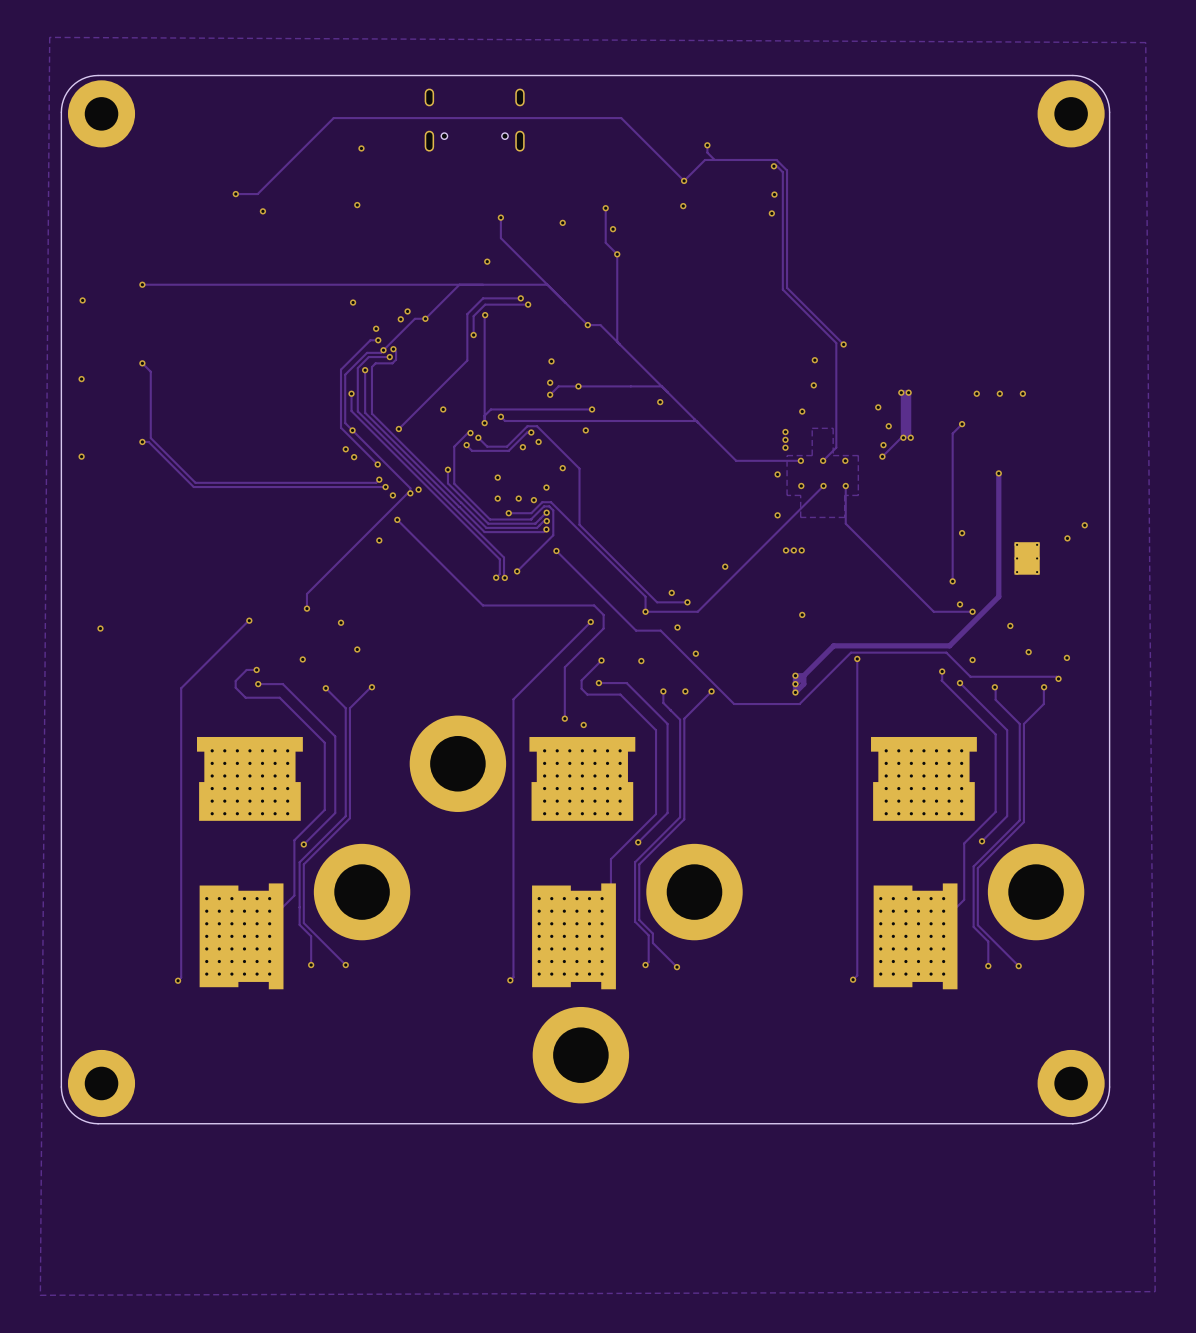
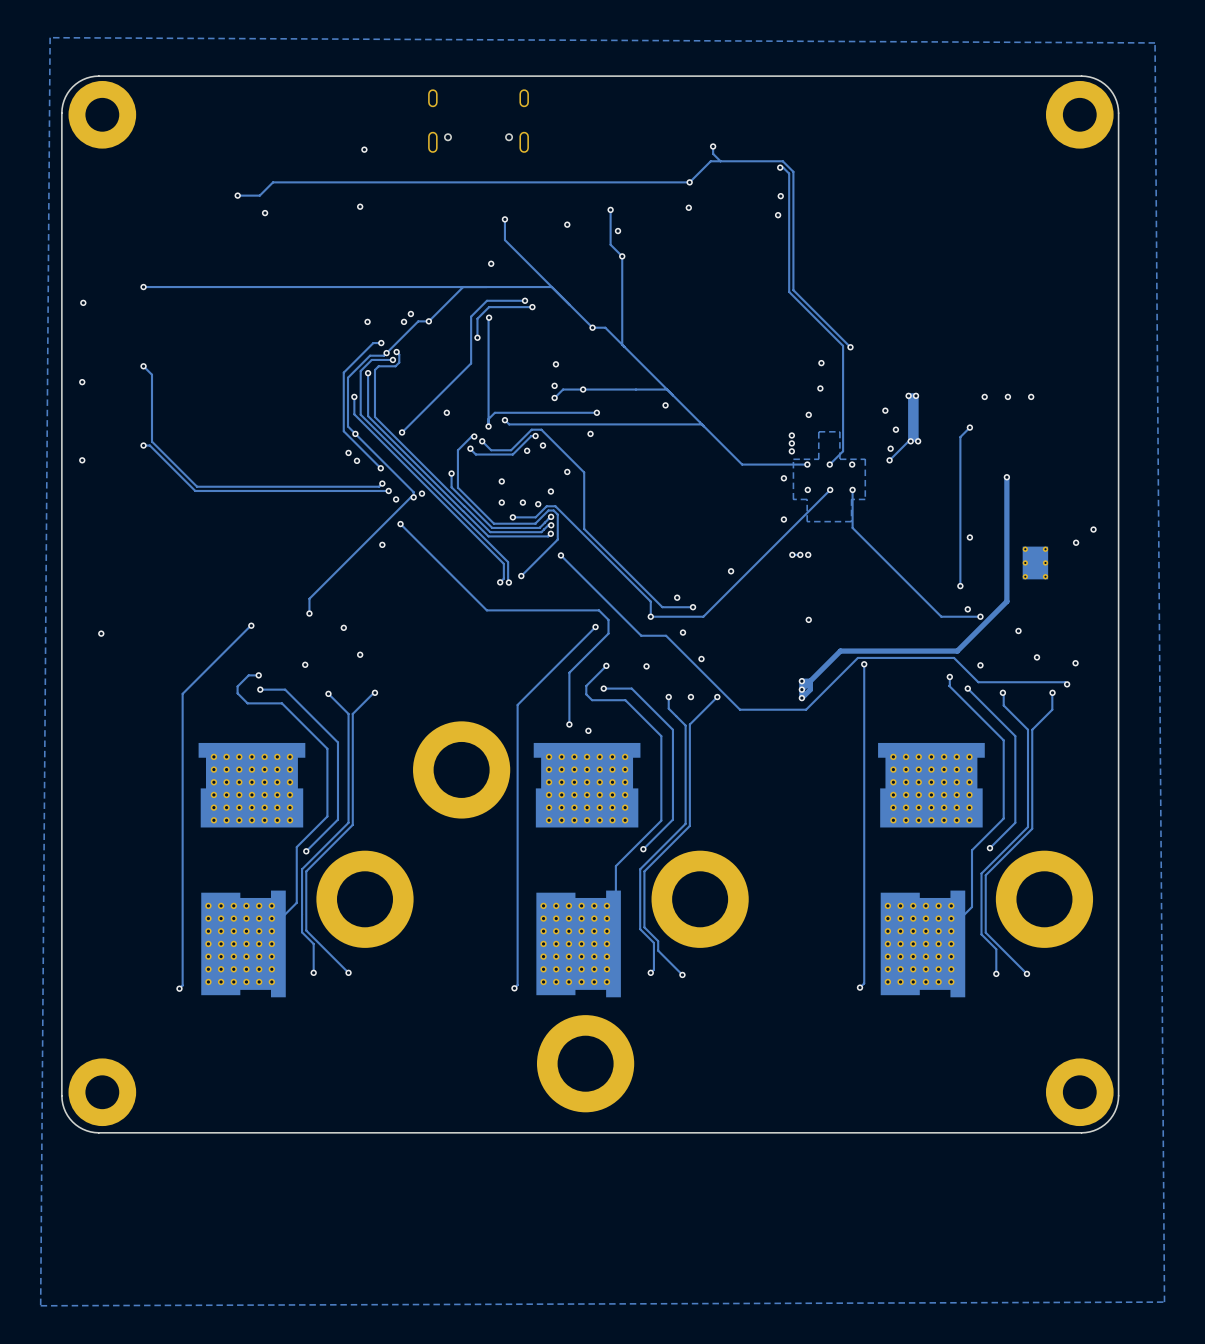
track: (684, 180) (621, 118) (333, 118) (270, 180) -> (689, 182) (273, 182)
via: (353, 302) -> none
via: none -> (367, 321)
via: (376, 328) -> none

